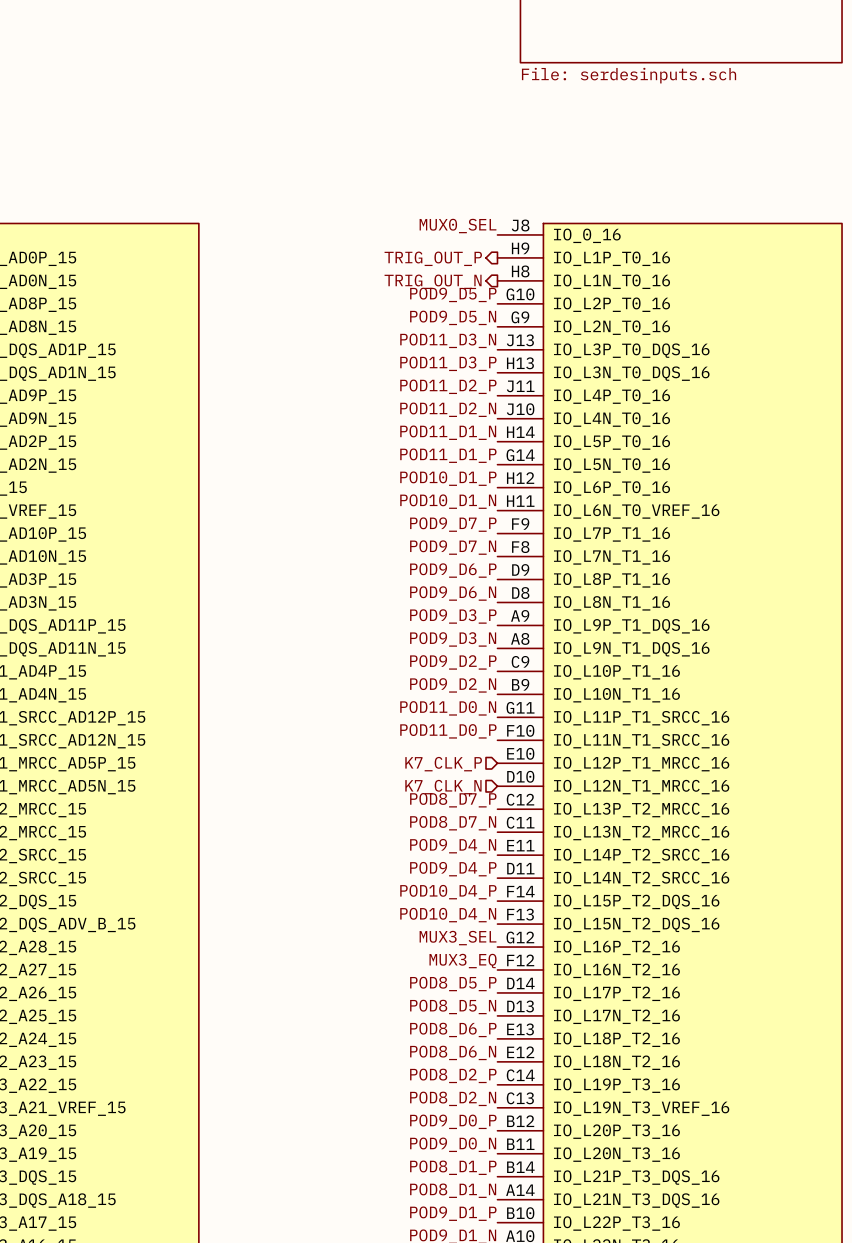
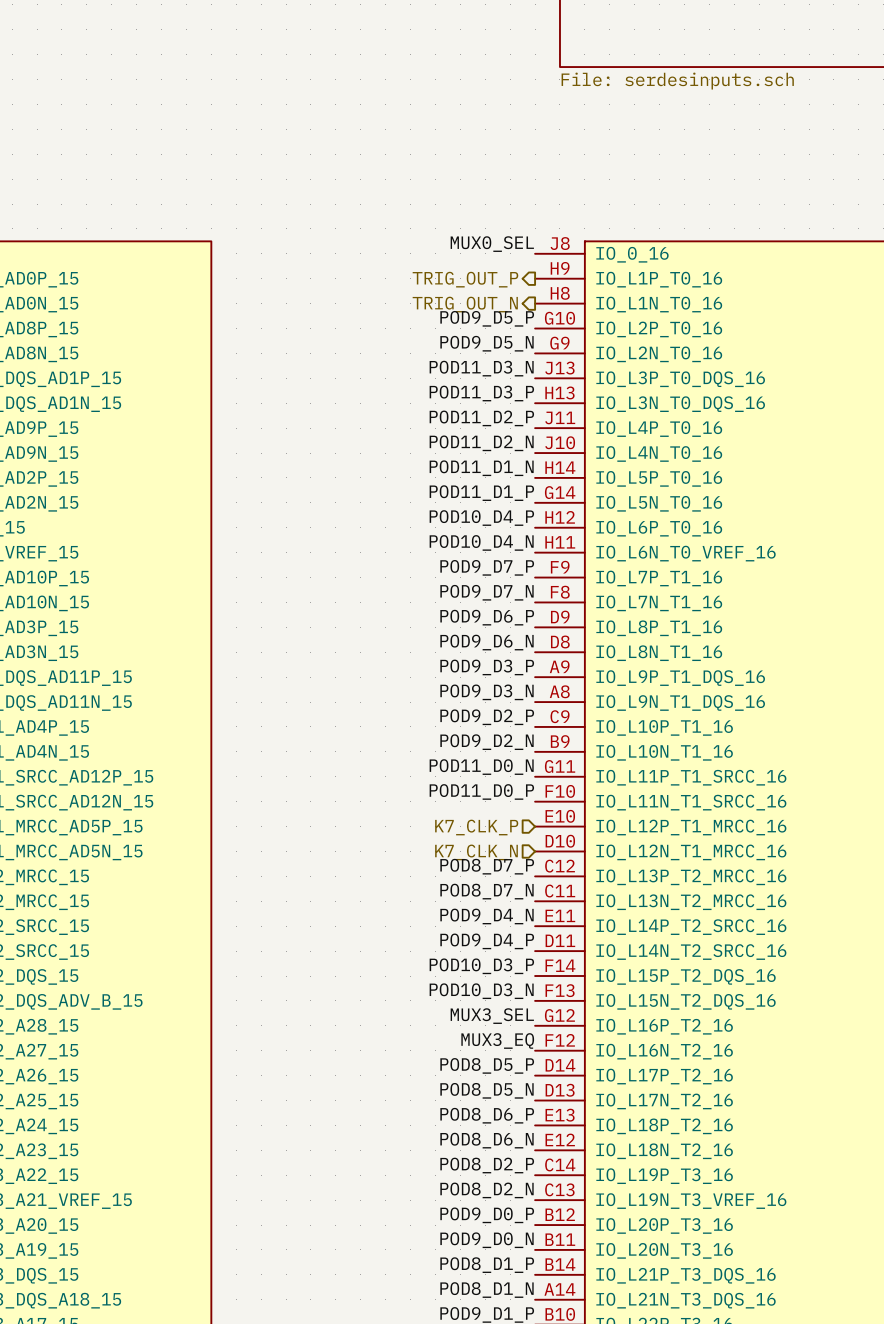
label: POD10_D1_P (448, 478) -> POD10_D4_P (481, 518)
label: POD10_D1_N (448, 501) -> POD10_D4_N (481, 542)
label: POD10_D4_P (448, 892) -> POD10_D3_P (481, 966)
label: POD10_D4_N (448, 915) -> POD10_D3_N (481, 991)

